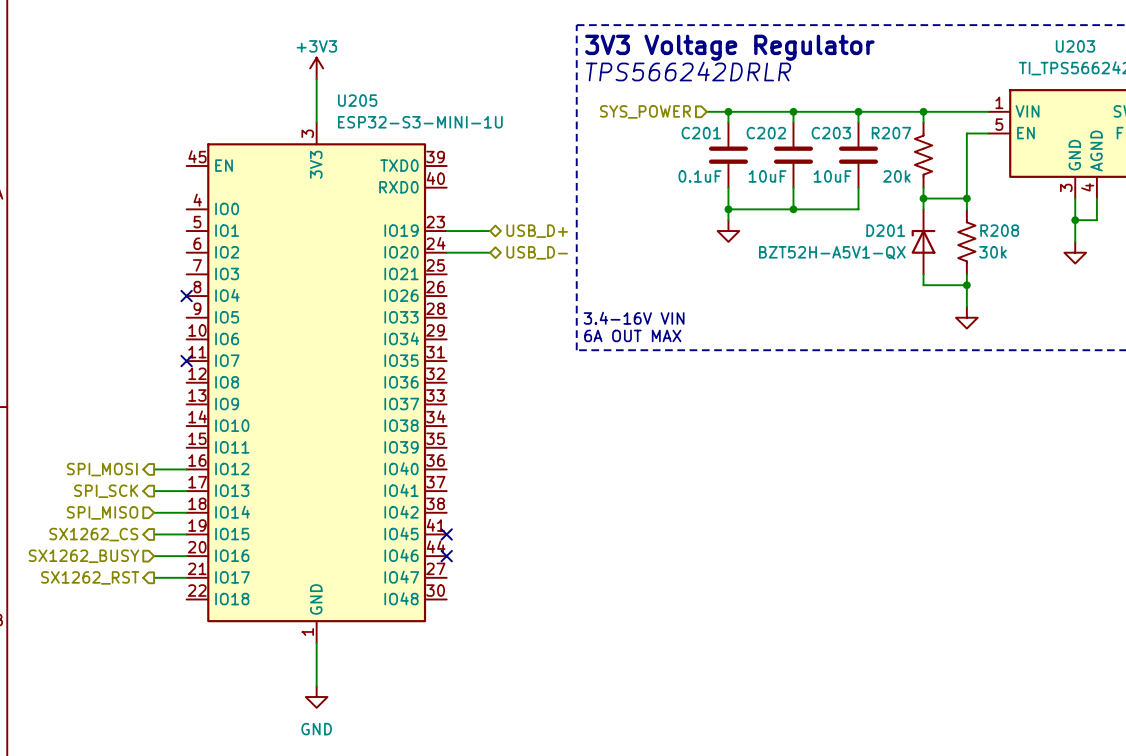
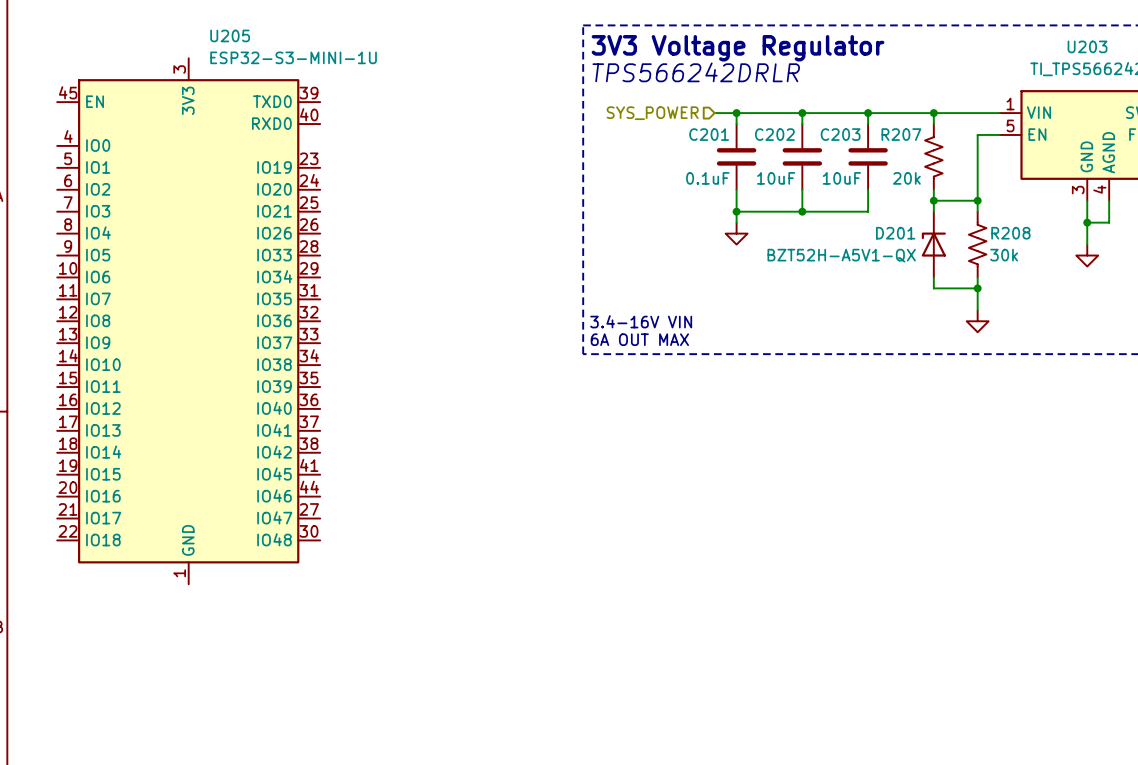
power symbol: +3V3 (316, 68) -> none
wire: (316, 79) (316, 122) -> none
wire: (446, 231) (490, 231) -> none
hierarchical label: USB_D+ (537, 231) -> none
wire: (446, 252) (490, 252) -> none
hierarchical label: USB_D- (537, 252) -> none
no-connect mark: (186, 296) -> none
no-connect mark: (186, 361) -> none
U205 position: (316, 382) -> (188, 321)
hierarchical label: SPI_MOSI (102, 469) -> none
hierarchical label: SPI_SCK (106, 491) -> none
hierarchical label: SPI_MISO (102, 512) -> none
hierarchical label: SX1262_CS (93, 534) -> none
no-connect mark: (446, 534) -> none
hierarchical label: SX1262_BUSY (84, 556) -> none
no-connect mark: (446, 556) -> none
hierarchical label: SX1262_RST (90, 577) -> none
wire: (154, 577) (186, 577) -> none
wire: (316, 642) (316, 686) -> none
power symbol: GND (316, 697) -> none

